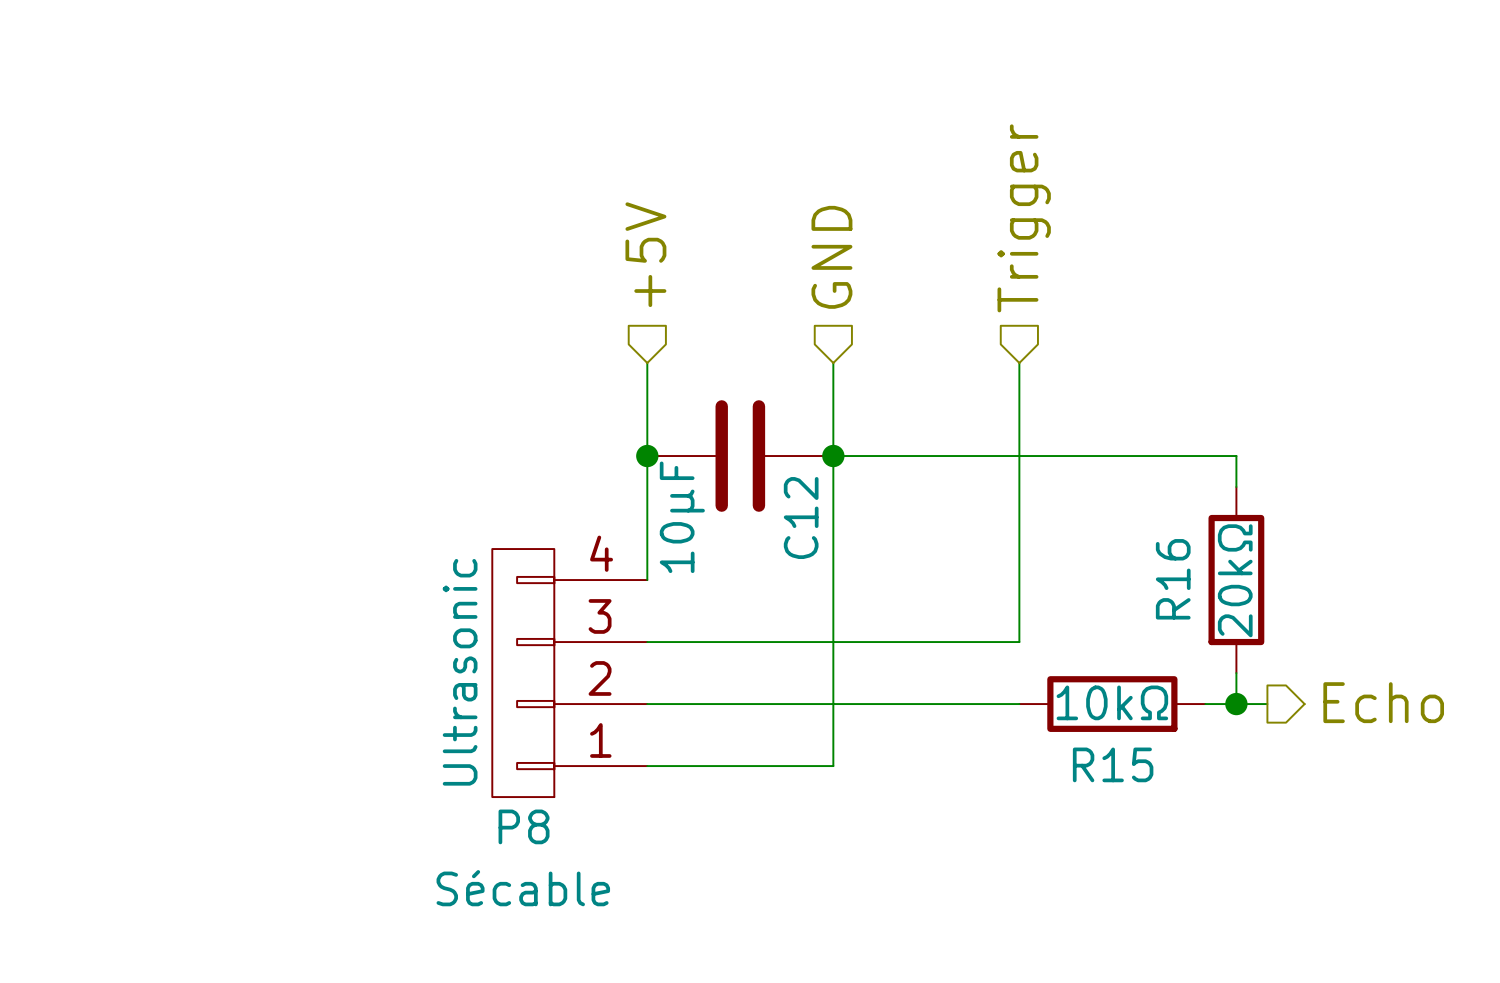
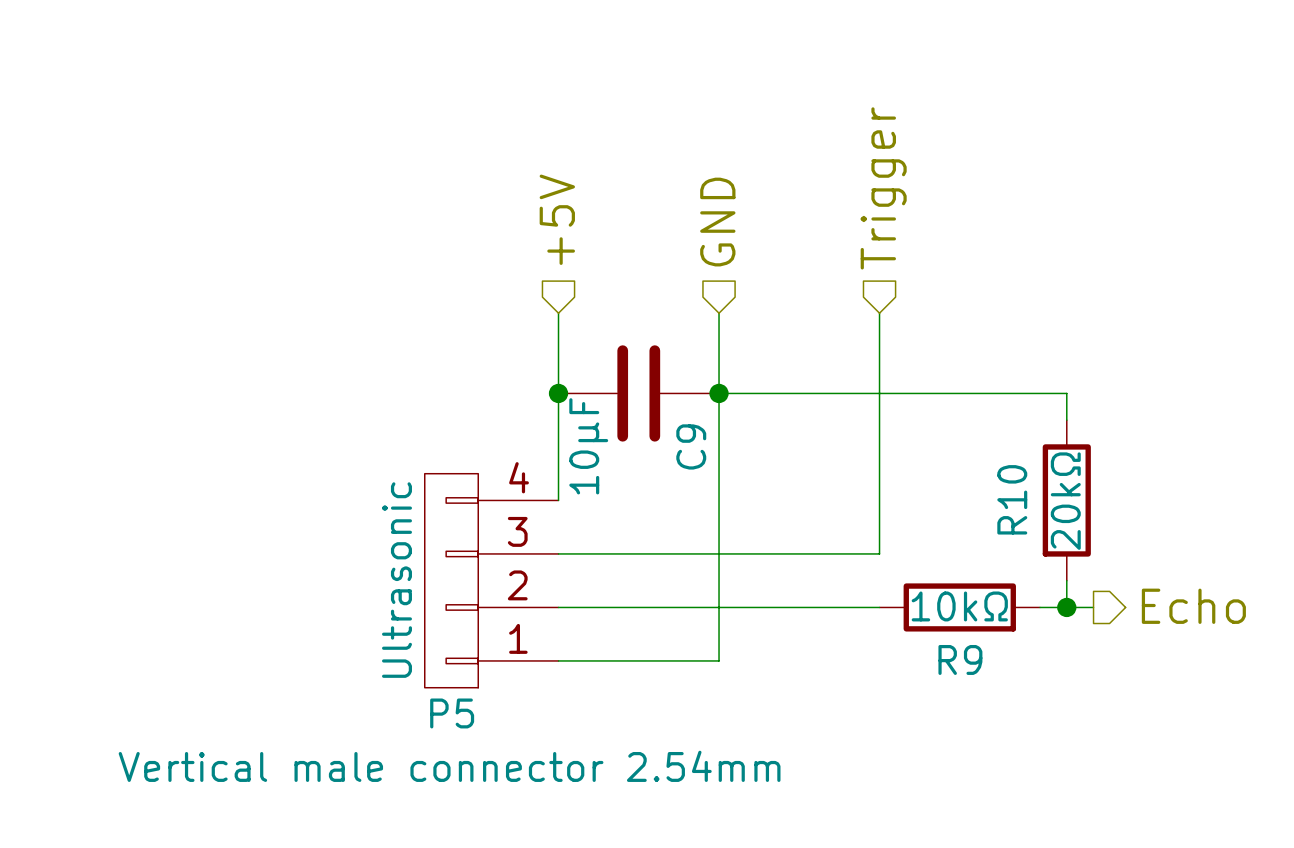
C12 name: C12 (801, 518) -> C9 (691, 446)
R16 name: R16 (1173, 579) -> R10 (1012, 499)
R15 name: R15 (1113, 764) -> R9 (960, 659)
P8 name: P8 (524, 826) -> P5 (452, 713)
P8 text: Sécable (523, 888) -> Vertical male connector 2.54mm (449, 766)

